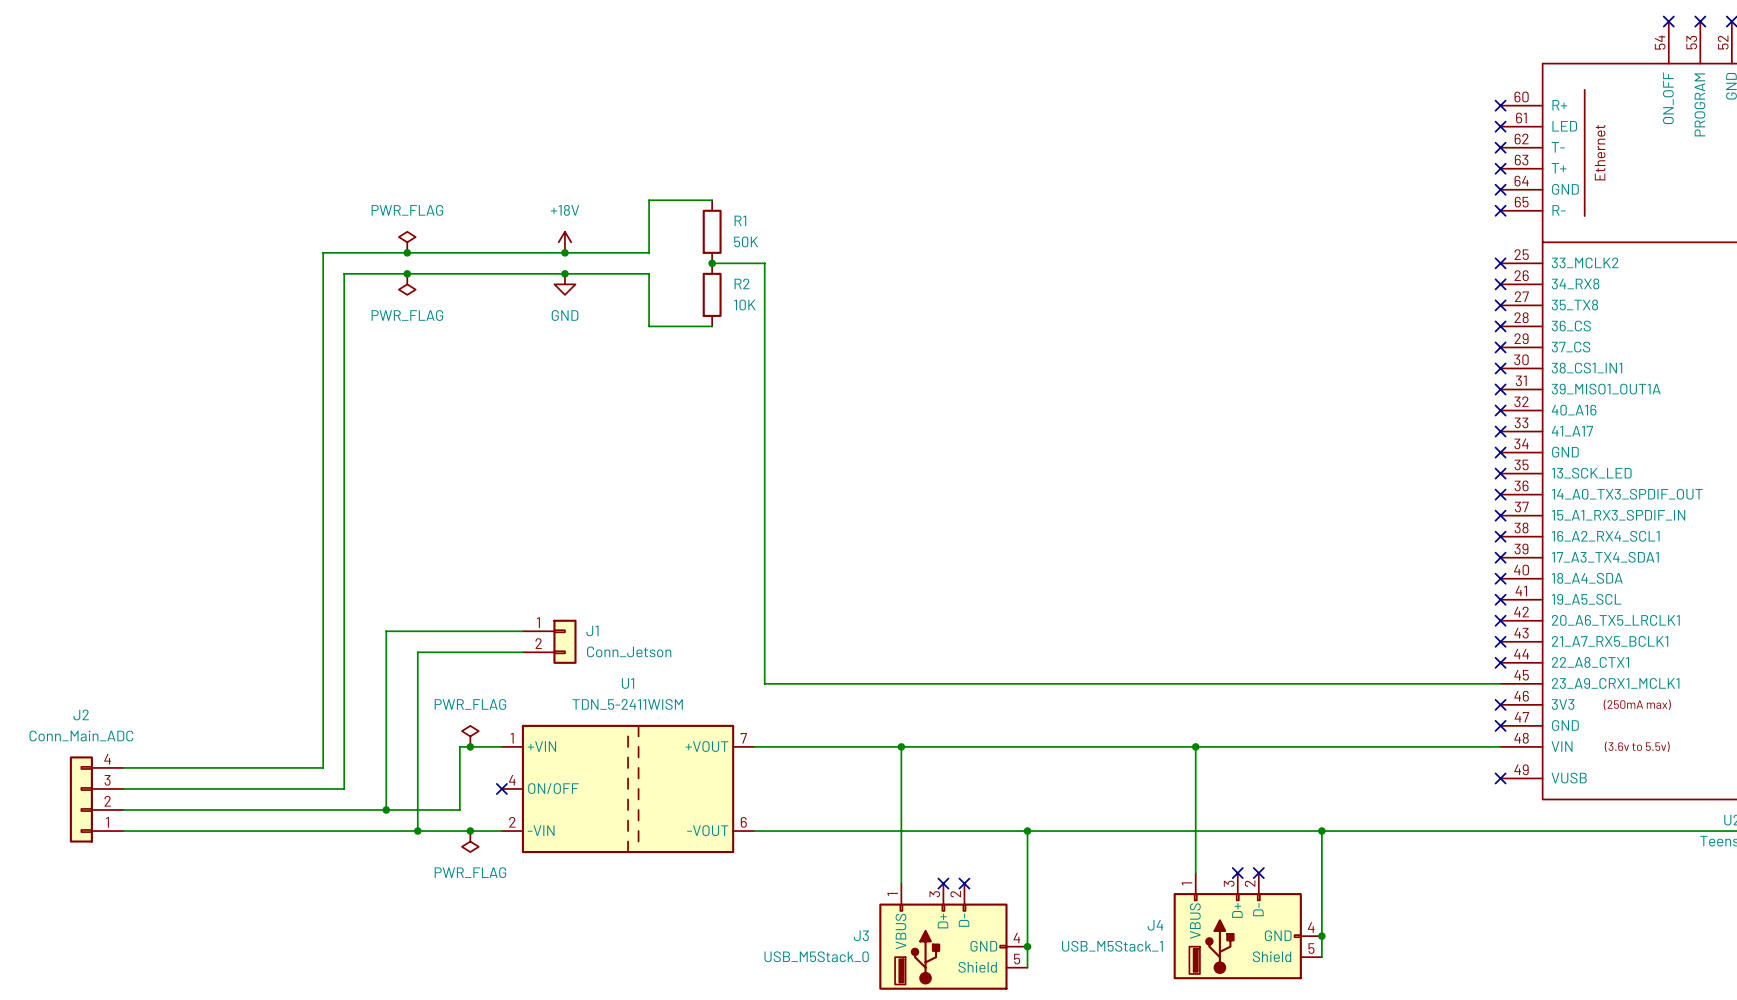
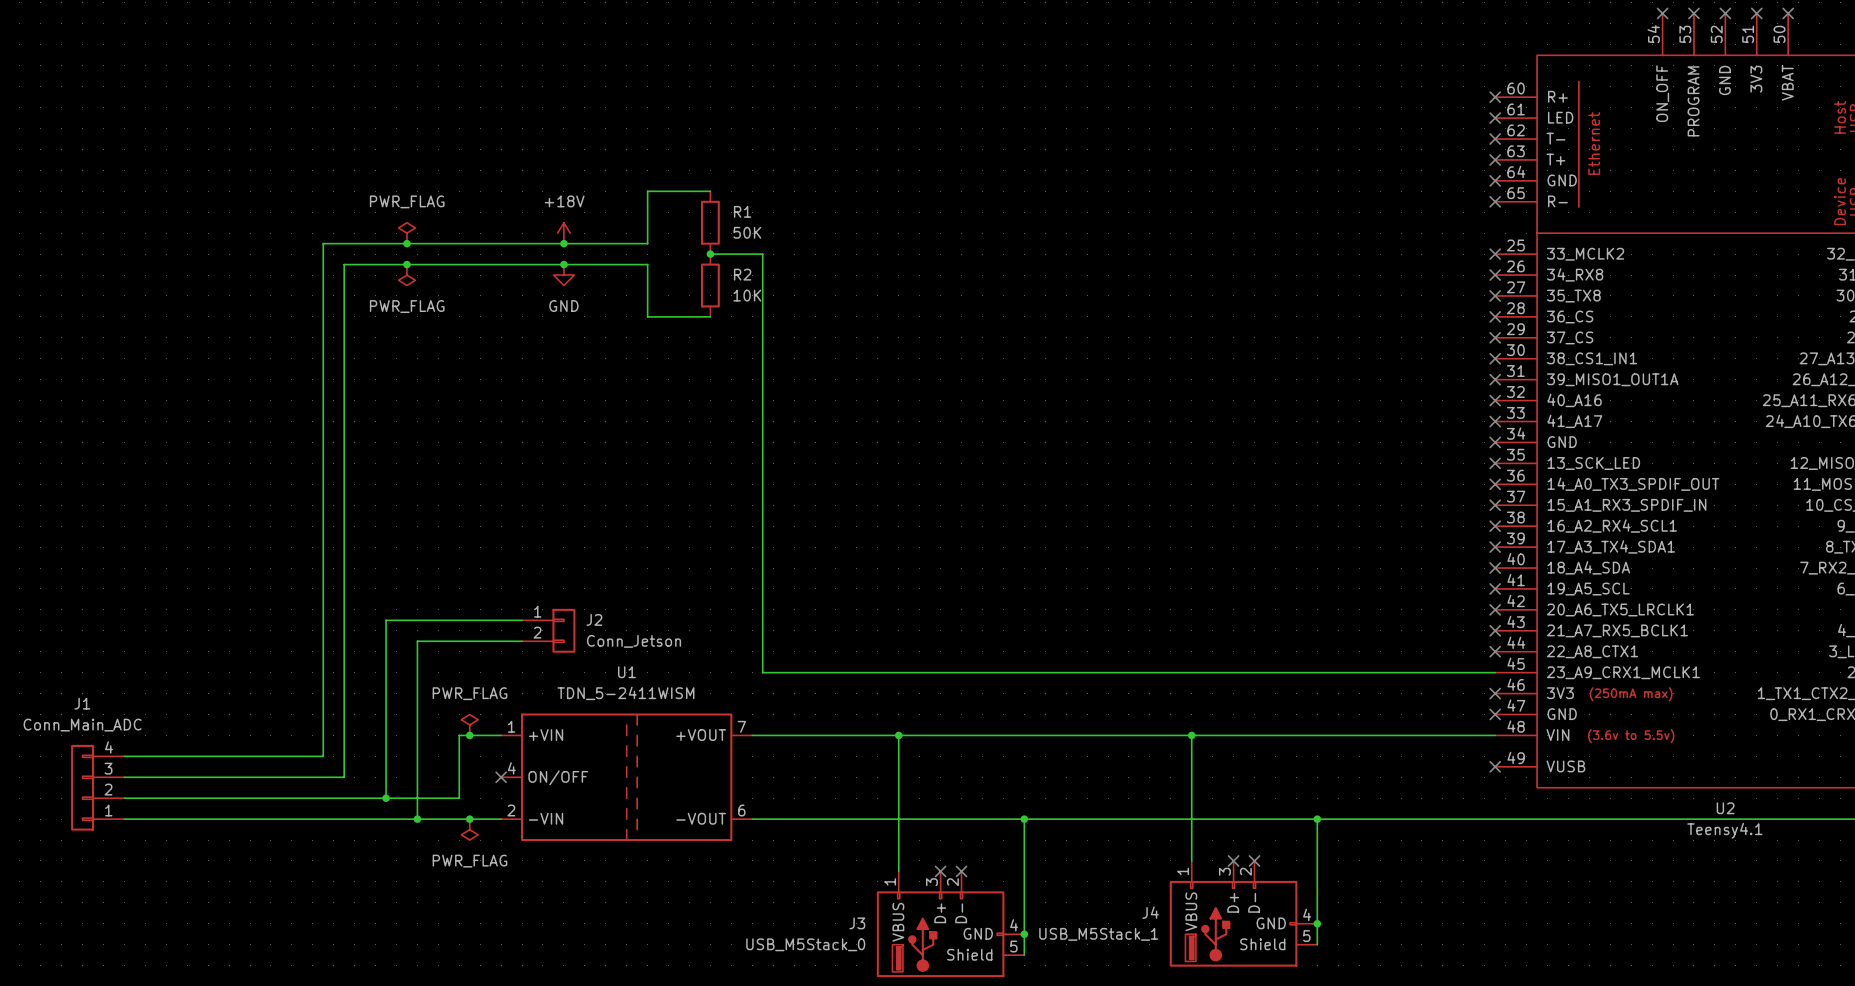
J1 name: J1 (592, 630) -> J2 (594, 619)
J2 name: J2 (81, 714) -> J1 (82, 703)

